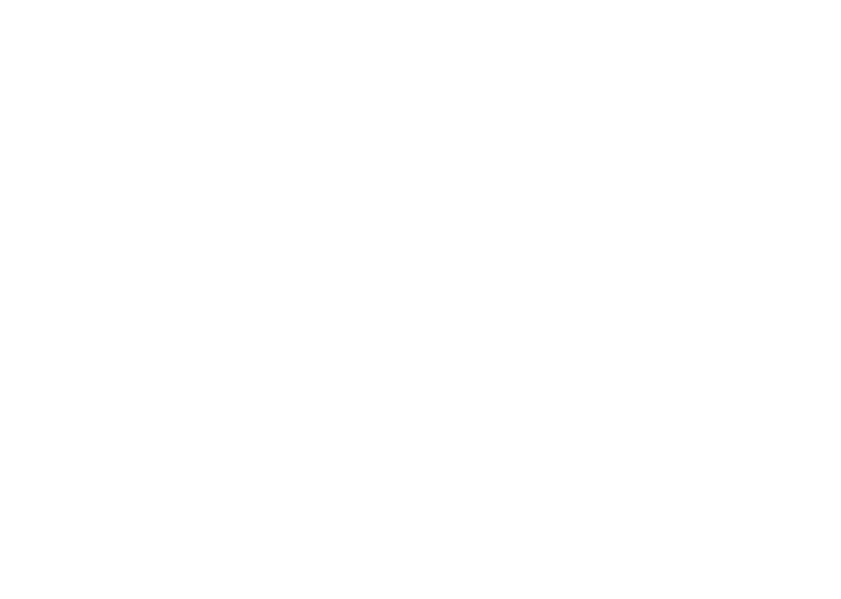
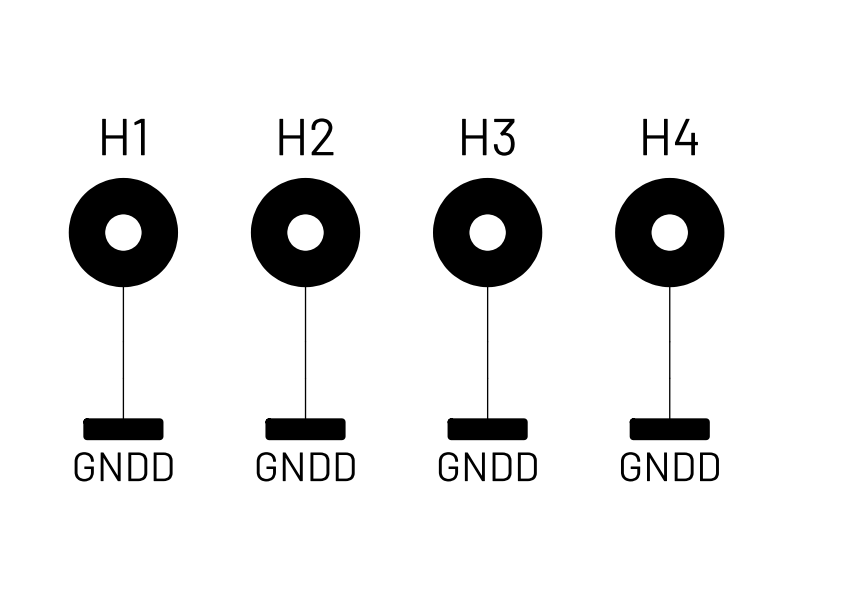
H1: none -> (123, 259)
H2: none -> (305, 259)
H3: none -> (487, 259)
H4: none -> (669, 259)
wire: none -> (123, 341) (123, 378)
wire: none -> (305, 341) (305, 378)
wire: none -> (487, 341) (487, 378)
wire: none -> (669, 341) (669, 378)
power symbol: none -> GNDD (123, 409)
power symbol: none -> GNDD (305, 409)
power symbol: none -> GNDD (487, 409)
power symbol: none -> GNDD (669, 409)

